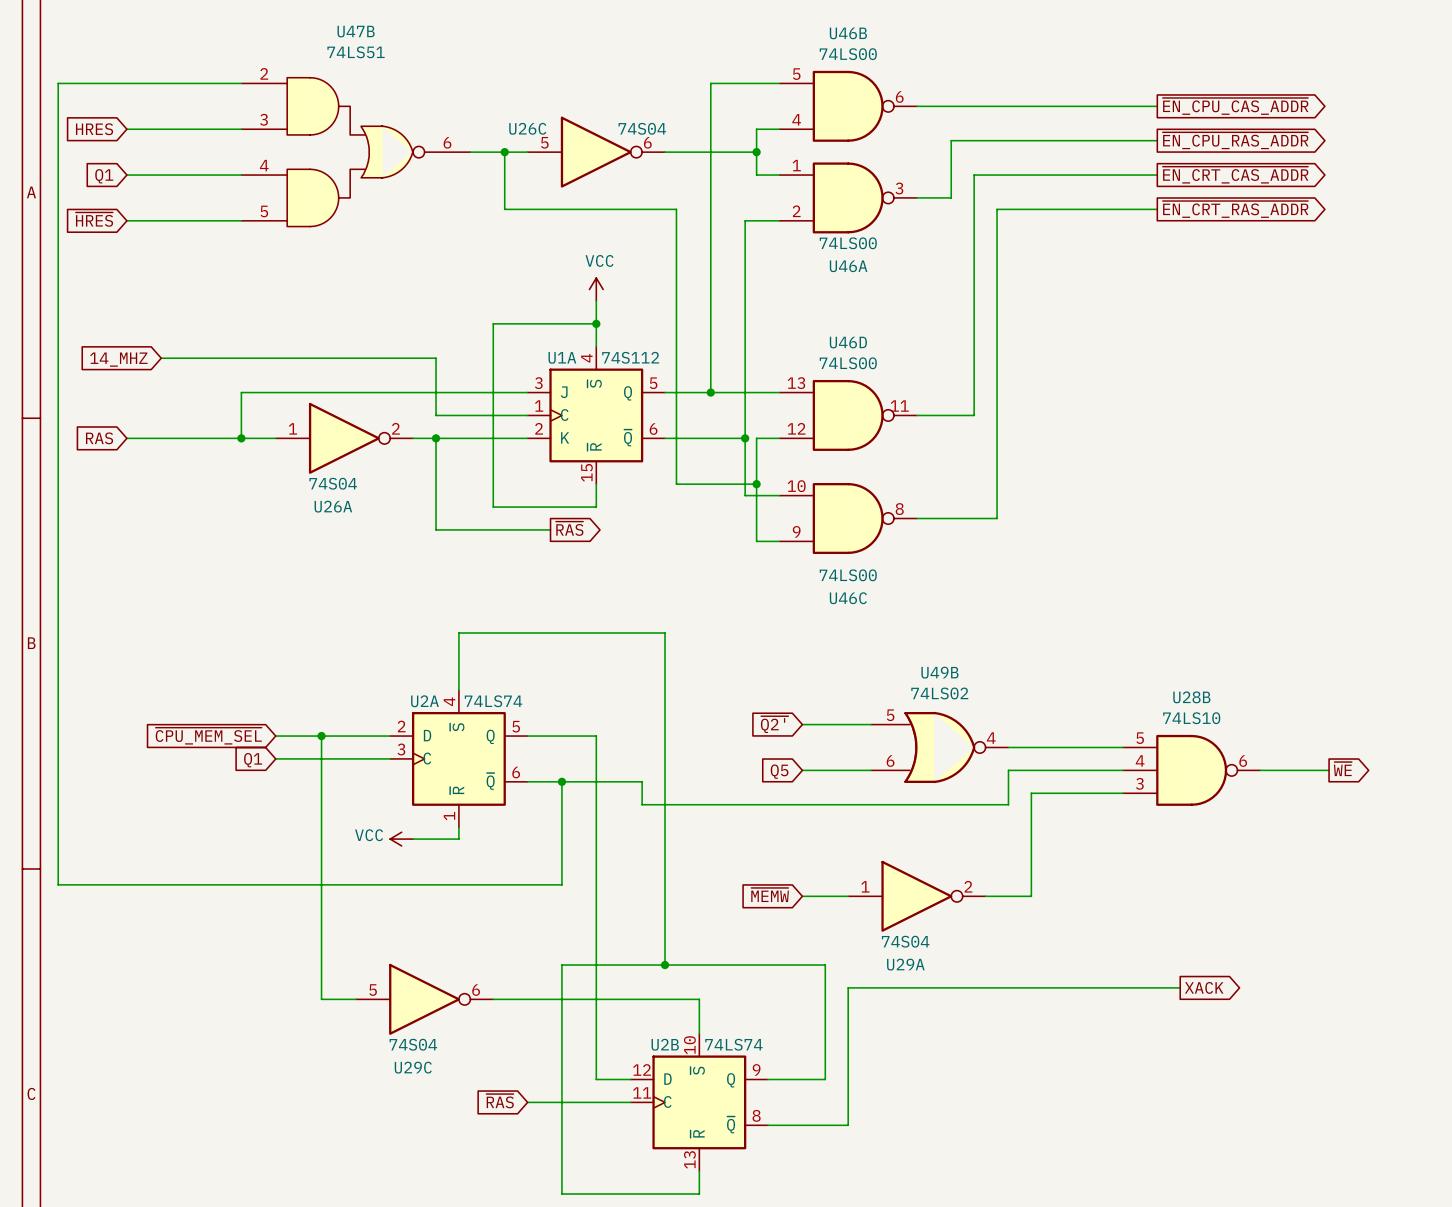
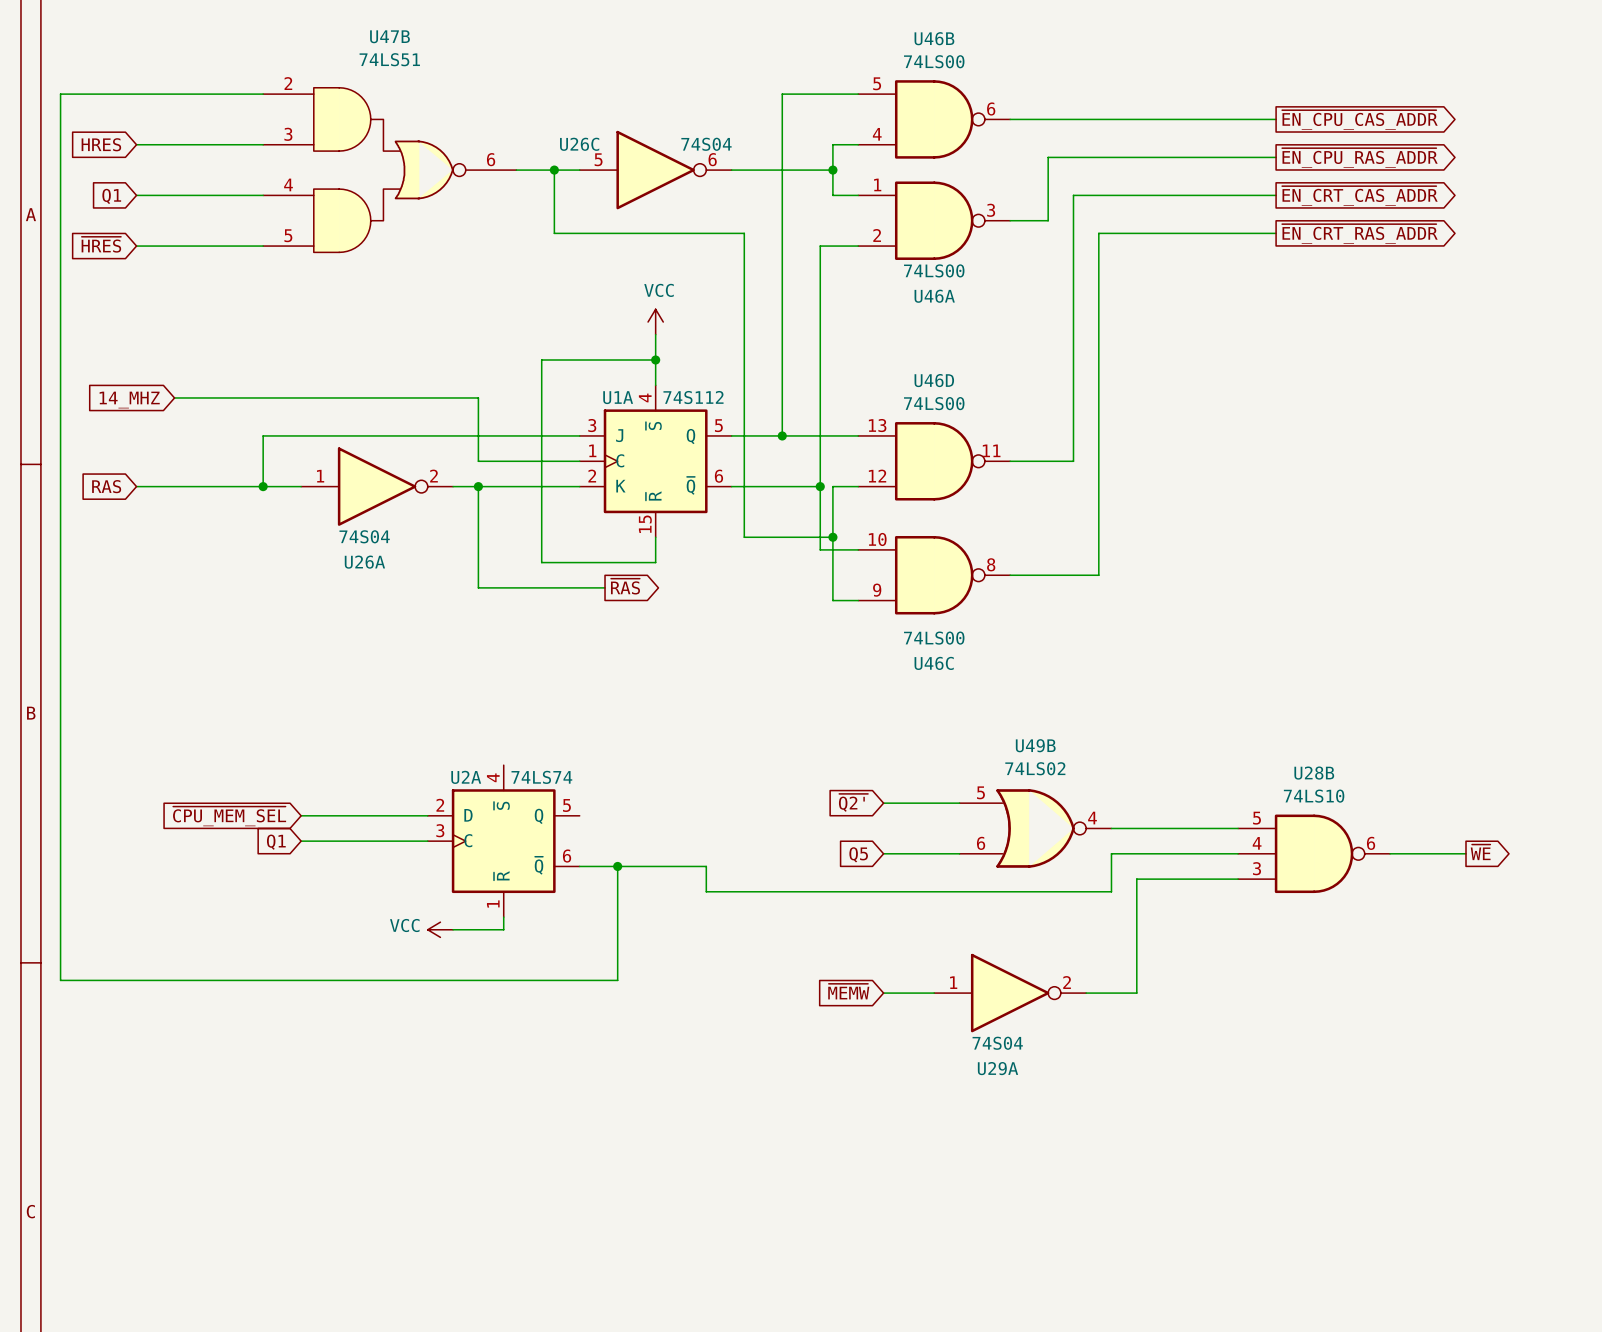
wire: (458, 690) (458, 632) (665, 632) (665, 965) -> none
wire: (321, 736) (321, 999) (355, 999) -> none
junction: (321, 736) -> none
wire: (527, 736) (596, 736) (596, 1079) (630, 1079) -> none
junction: (665, 965) -> none
wire: (1180, 987) (848, 987) (848, 1125) (768, 1125) -> none
global label: XACK (1204, 987) -> none
U29C: 74S04 (424, 999) -> none
wire: (493, 999) (699, 999) (699, 1033) -> none
wire: (768, 1079) (825, 1079) (825, 965) (561, 965) (561, 1193) (699, 1193) (699, 1171) -> none
global label: ~{RAS} (500, 1101) -> none
wire: (527, 1102) (630, 1102) -> none
U2B: 74LS74 (699, 1102) -> none

